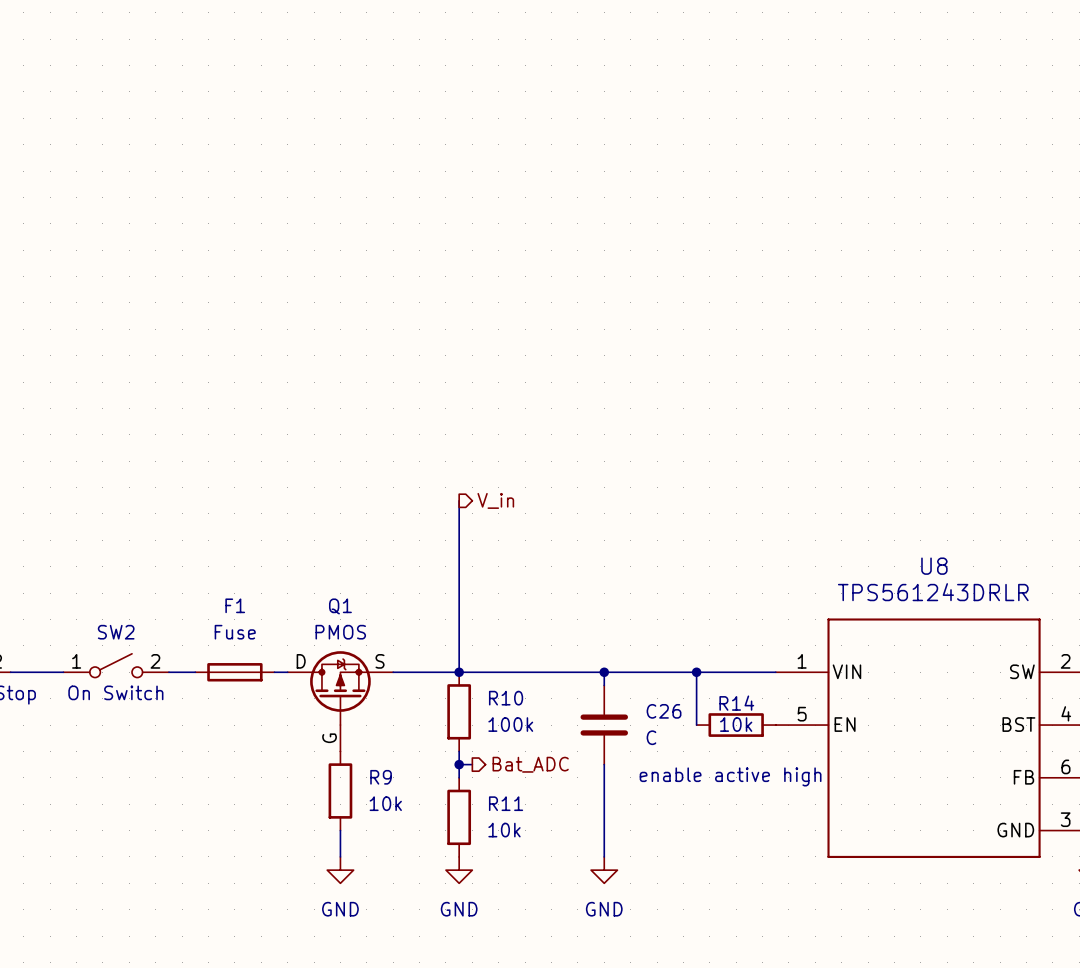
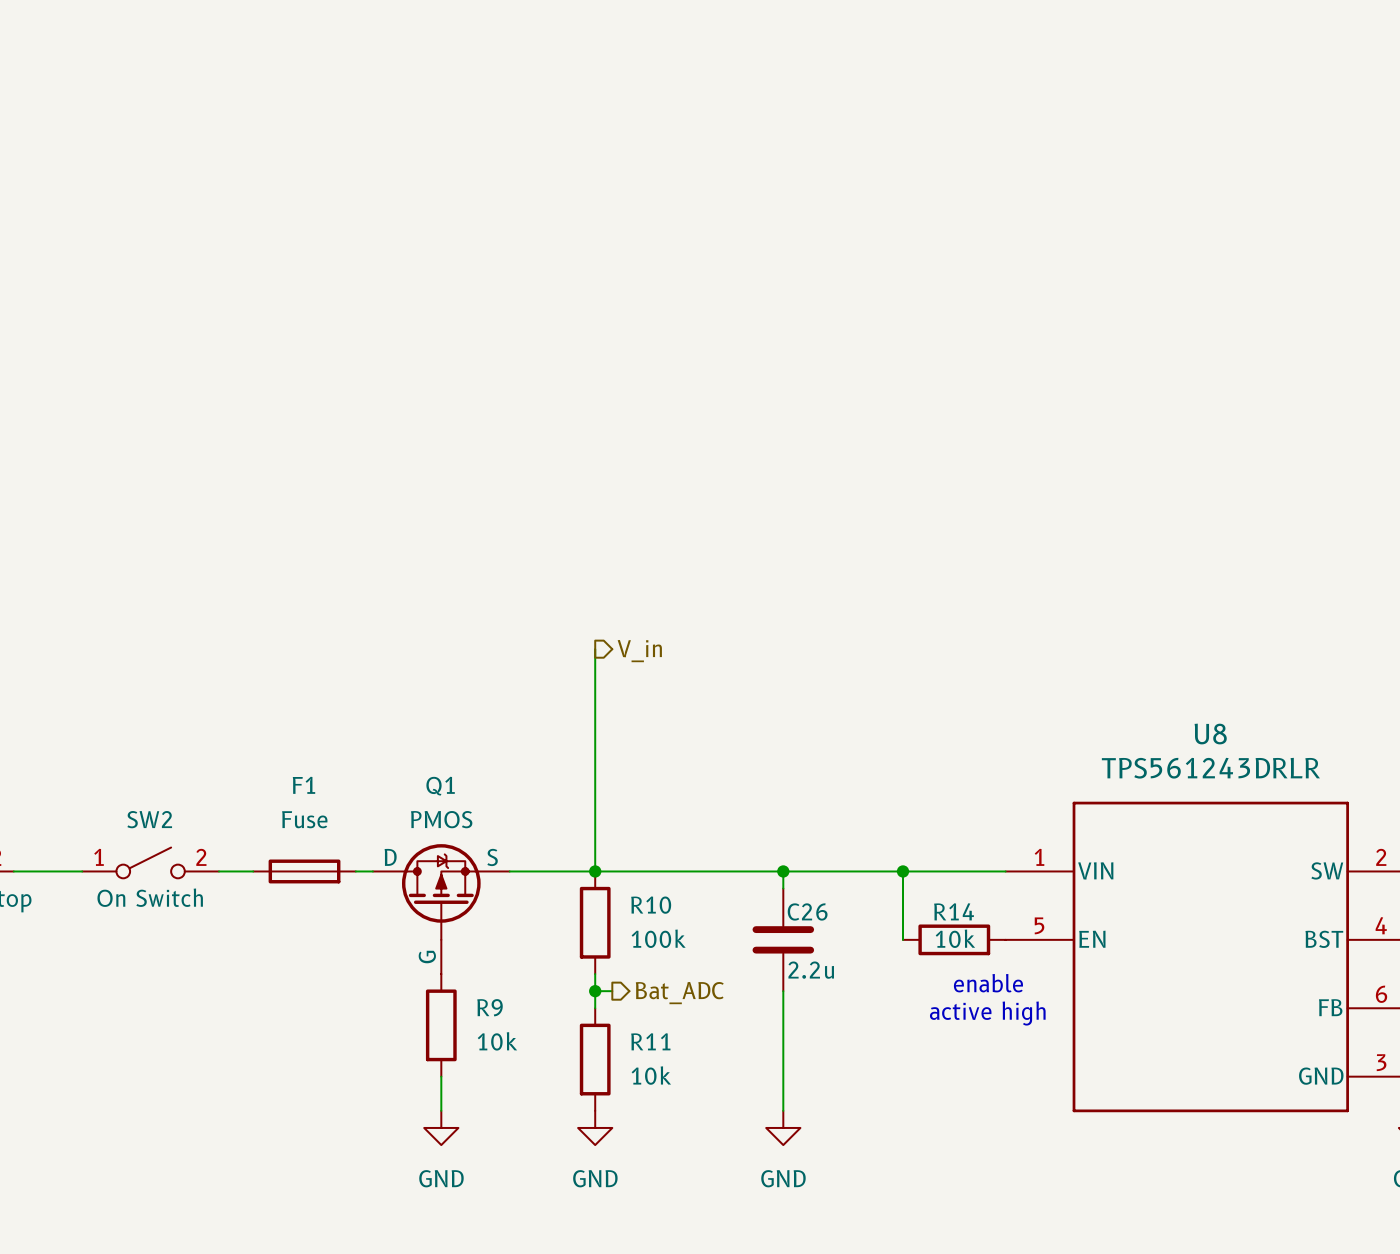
C26 name position: C26 (664, 711) -> C26 (807, 911)
C26 value: C (651, 737) -> 2.2u (811, 970)
text: none -> enable (988, 983)
text: enable active high (730, 776) -> active high (987, 1013)

